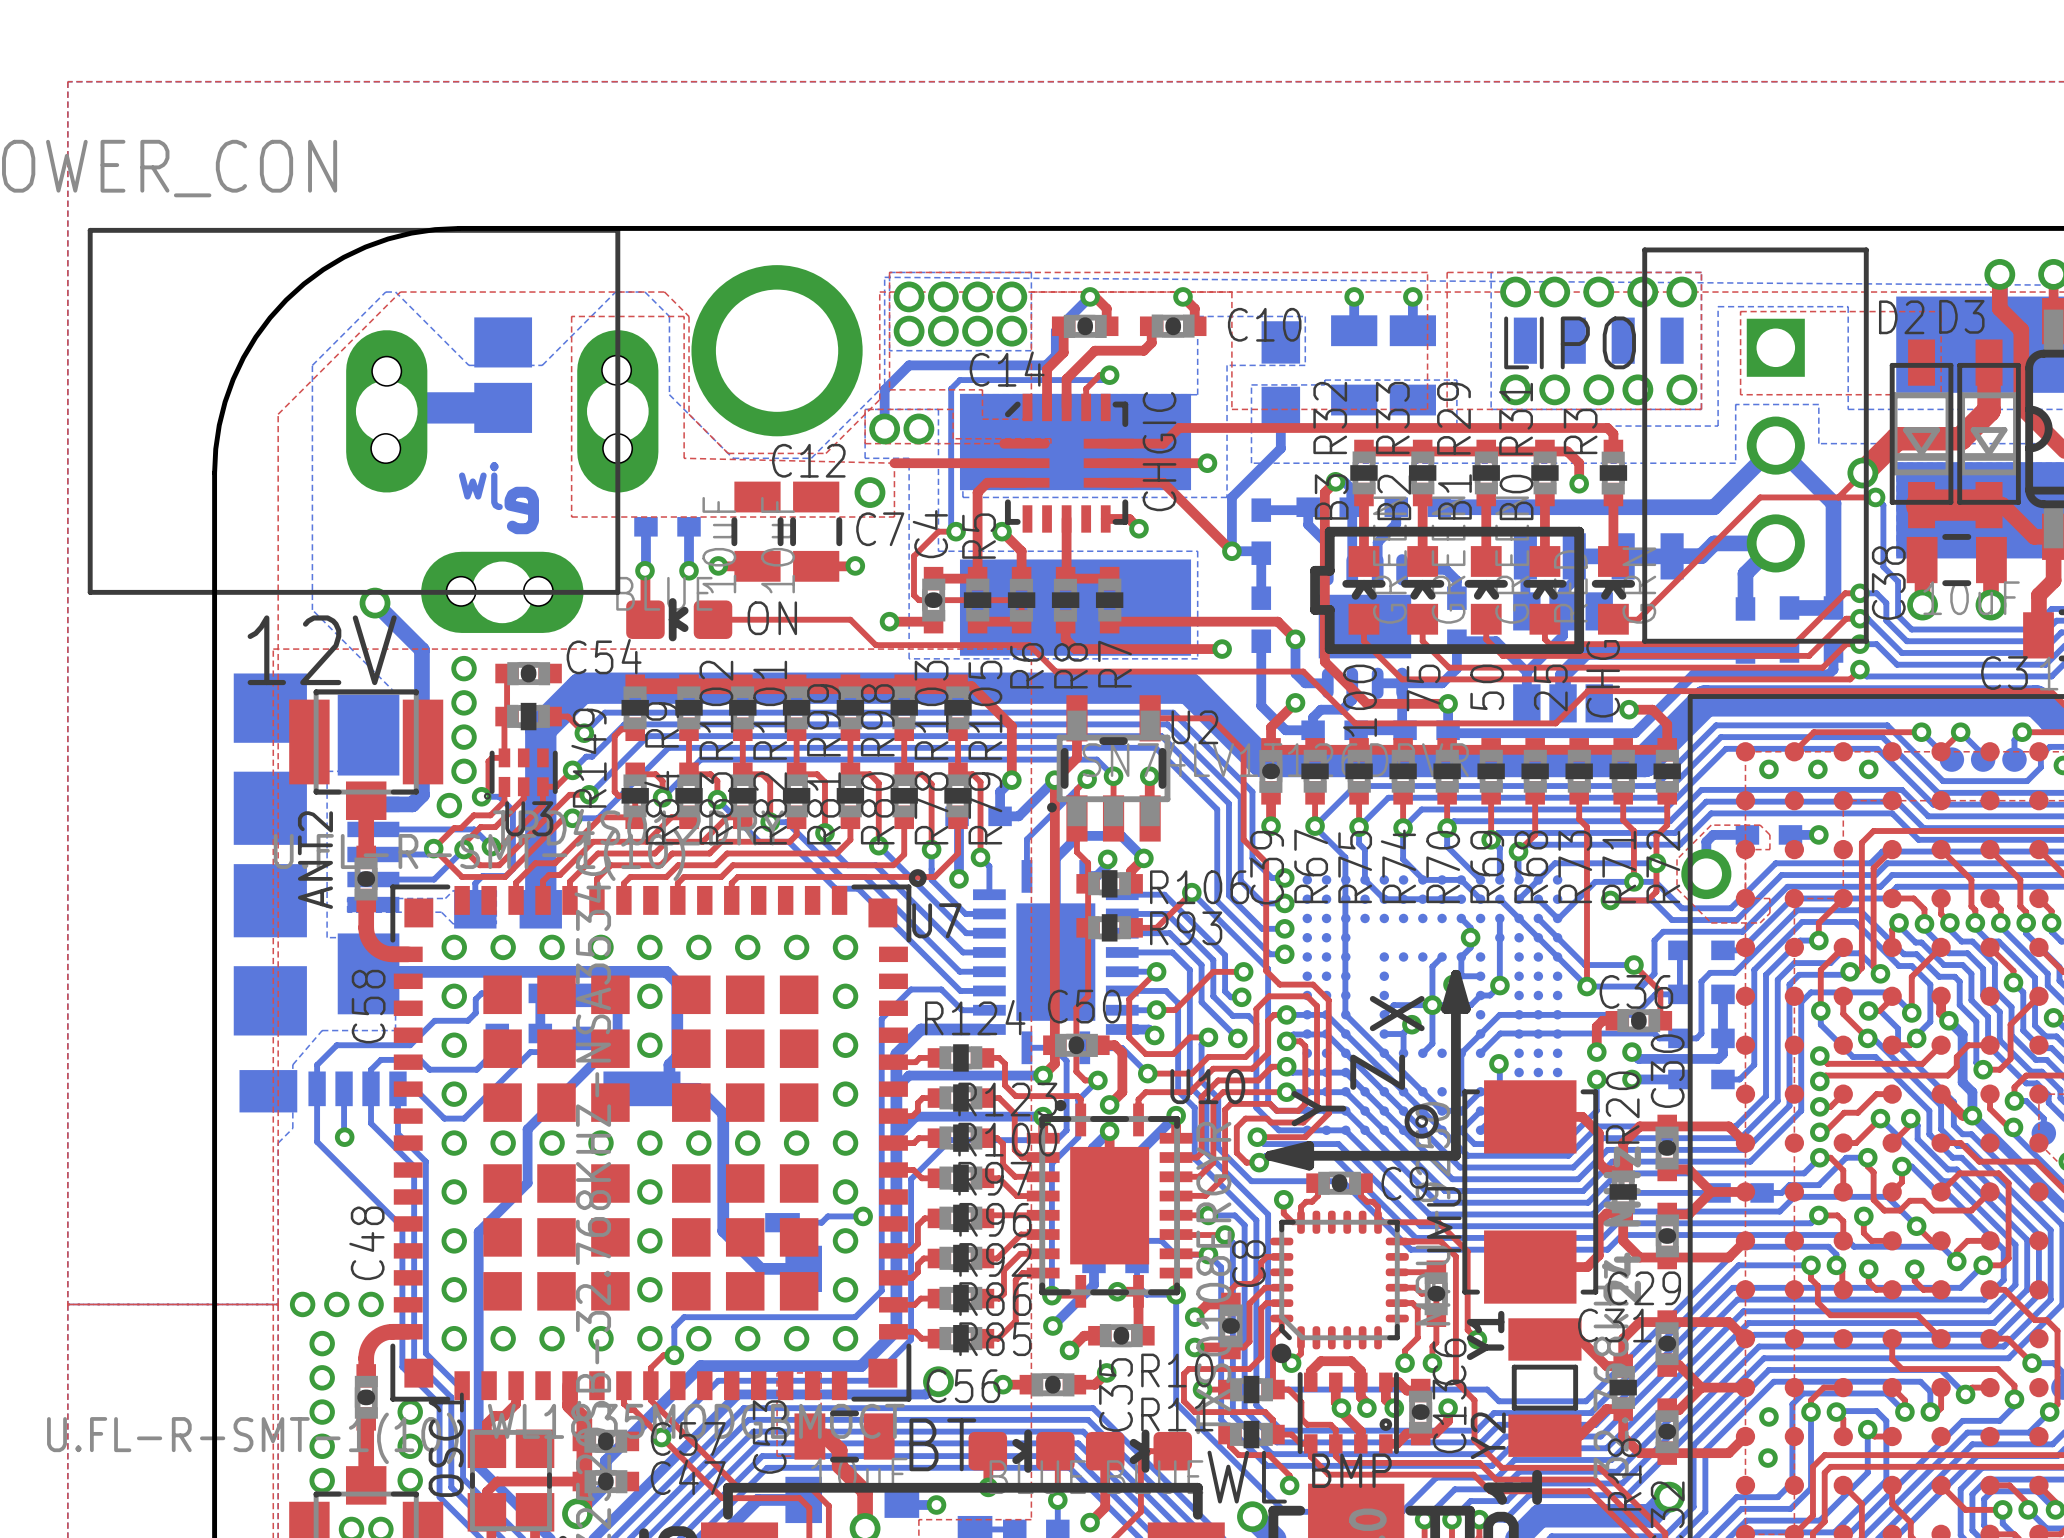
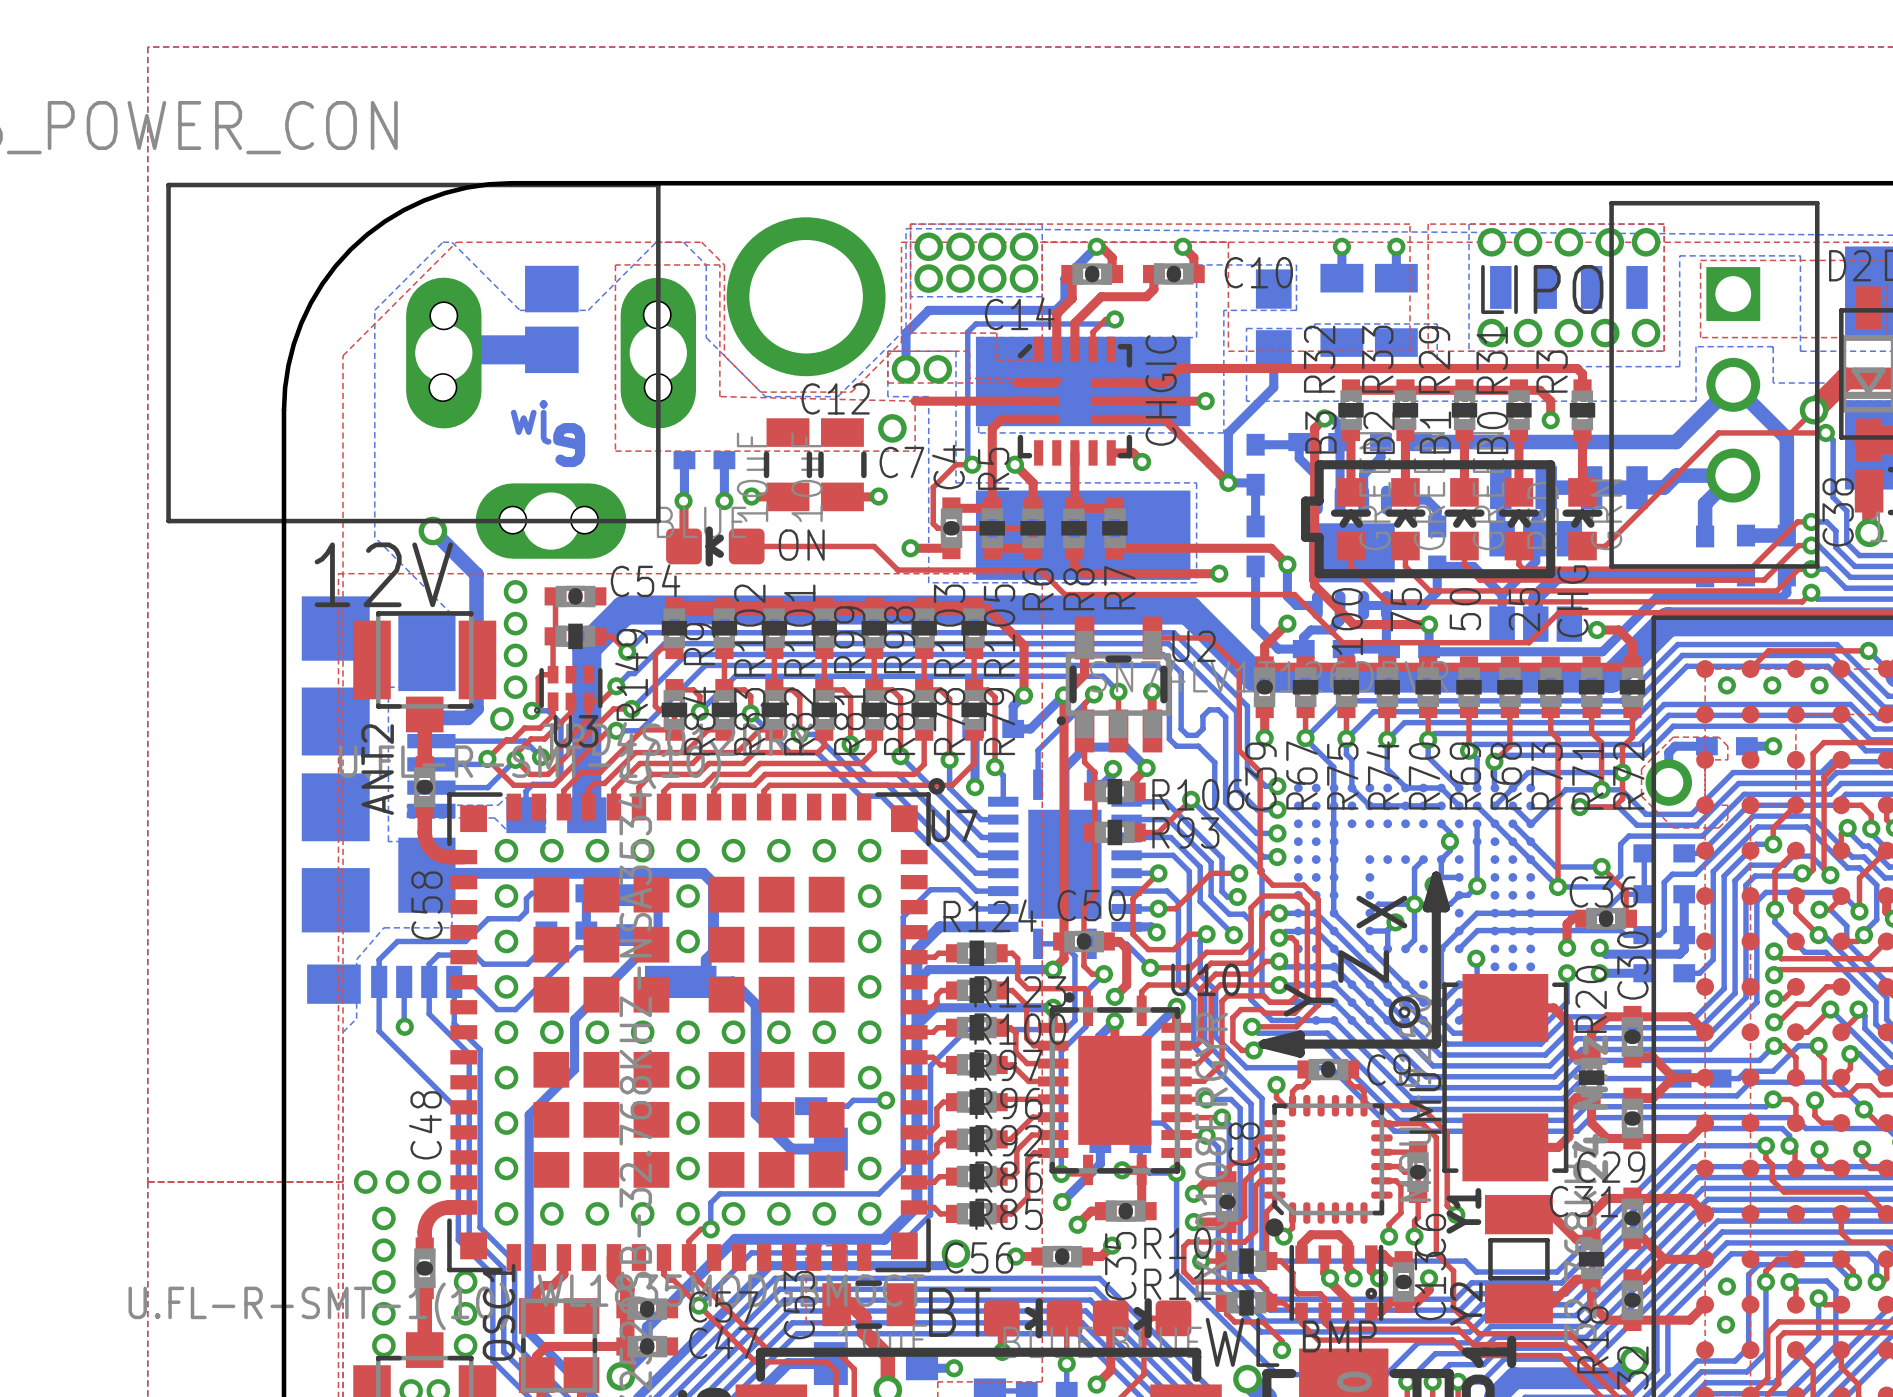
bottom track: (1181, 755) (1221, 795) -> (1181, 672) (1181, 728) (1187, 735) (1196, 735) (1202, 728) (1202, 716) (1209, 709) (1218, 709)
bottom track: (1168, 760) (1217, 809) (1217, 852) -> (1169, 677) (1169, 738) (1176, 746) (1198, 746) (1214, 762)

